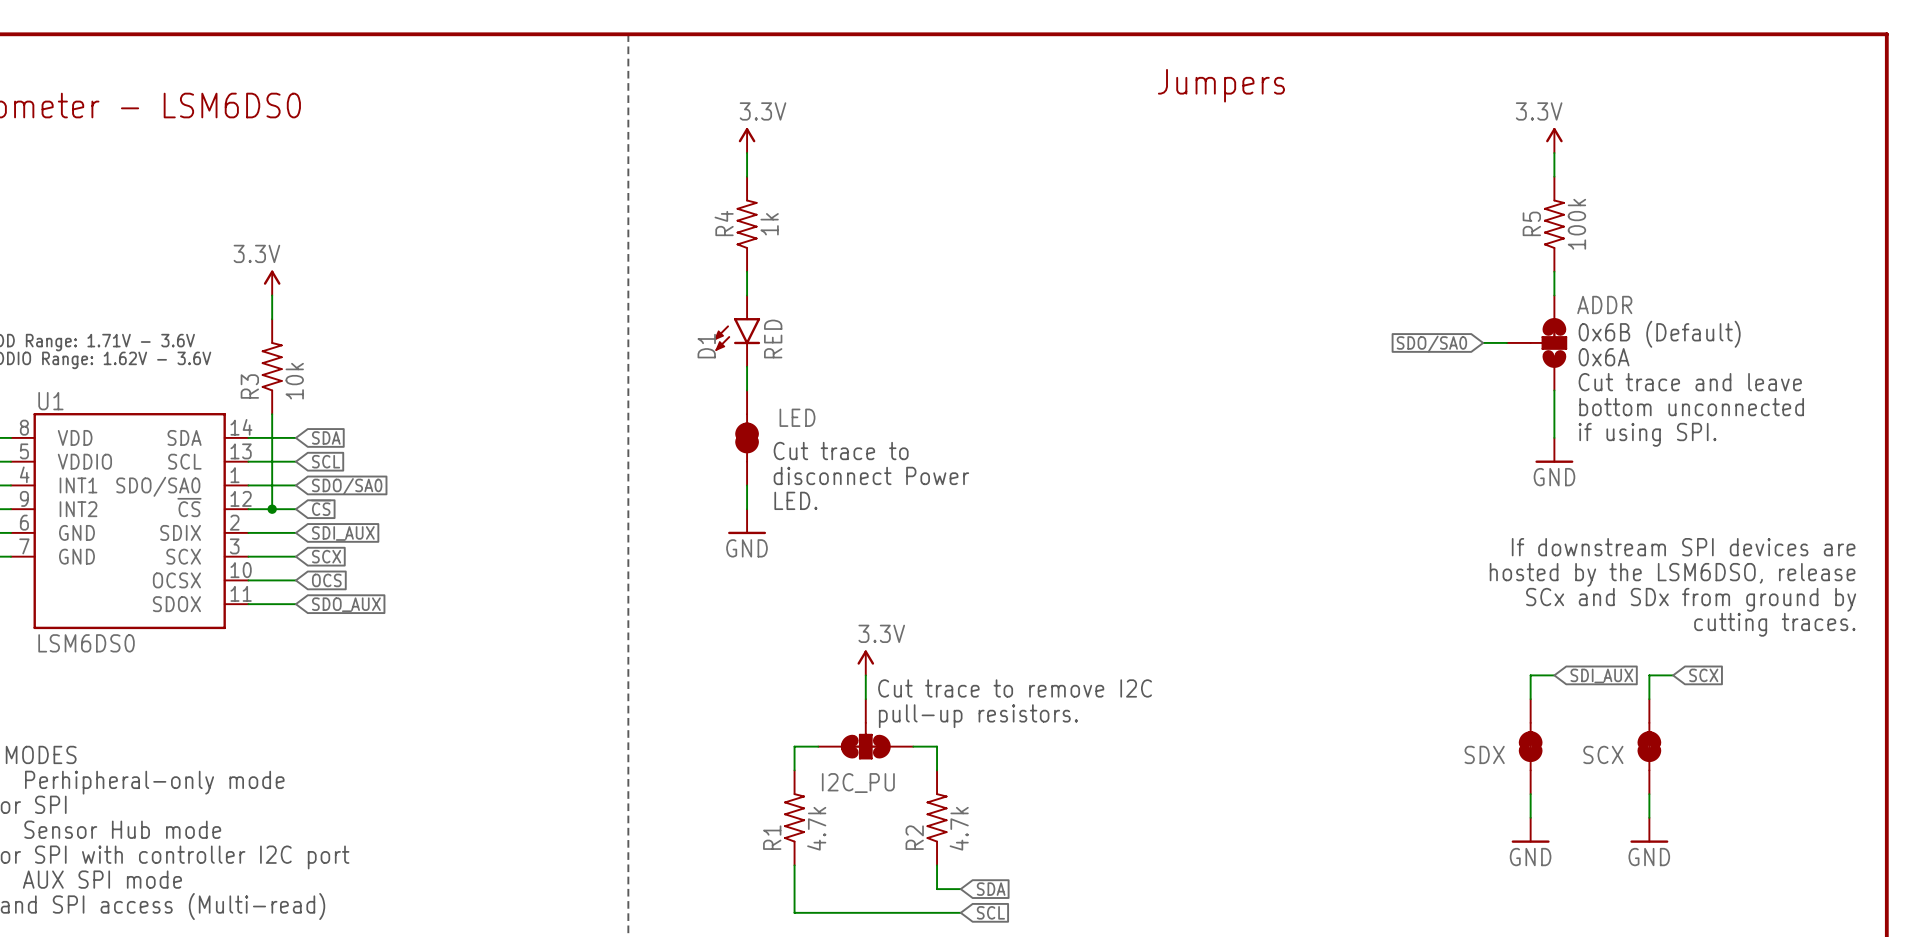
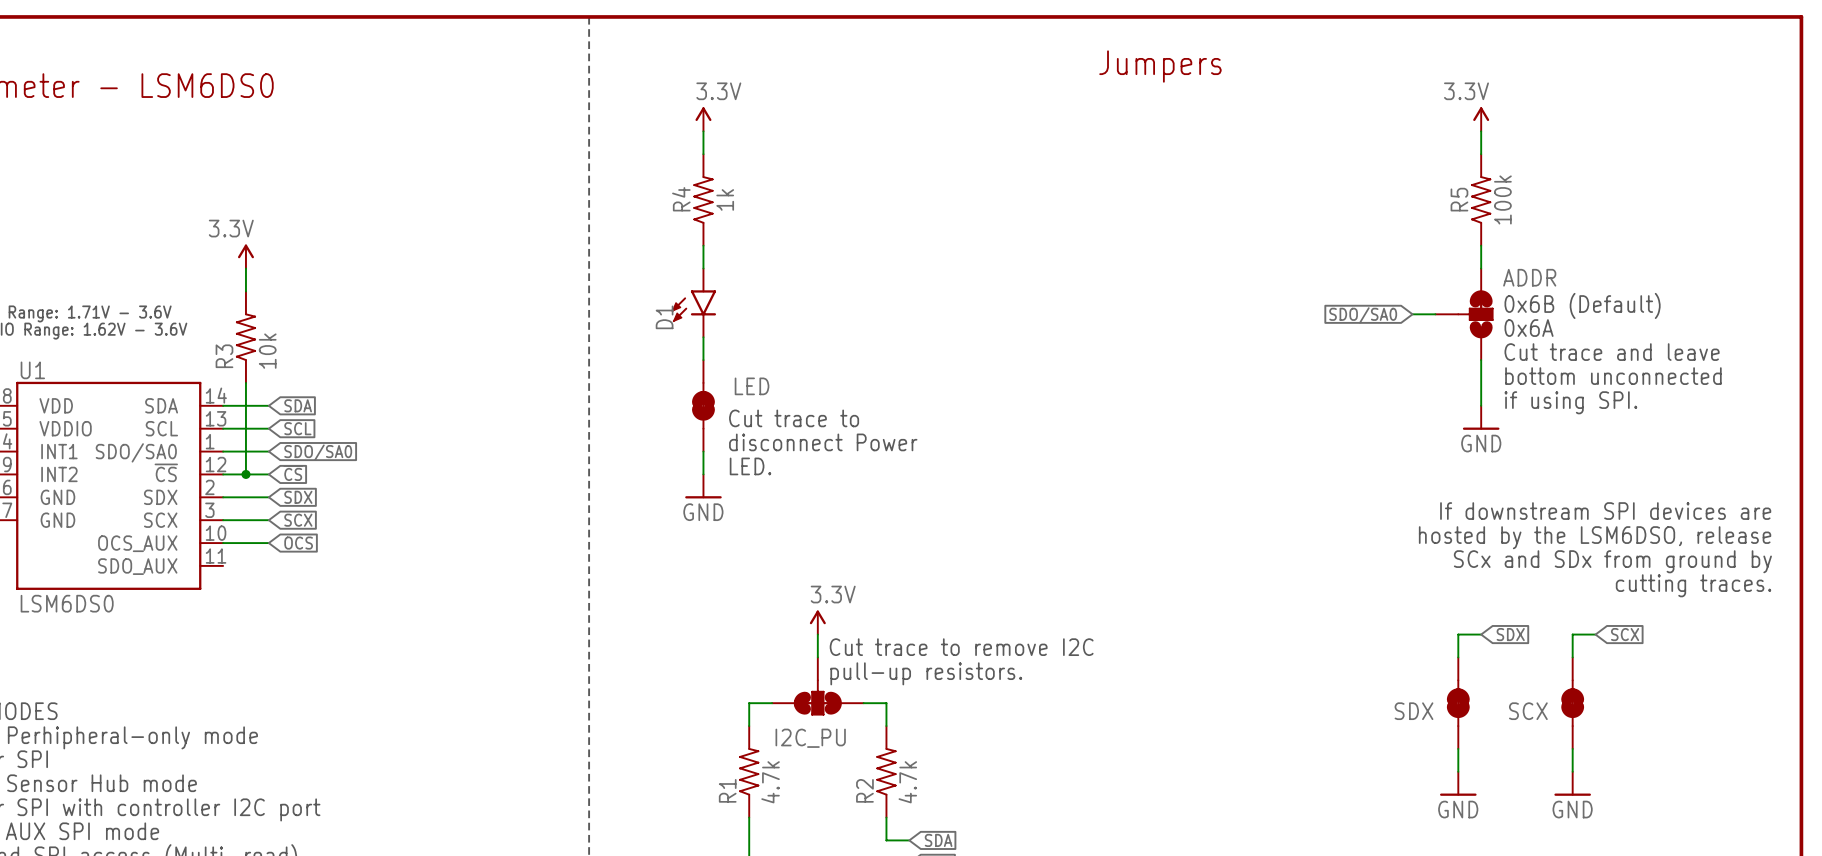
D1 value: RED (773, 339) -> none
U1 pin name: SDIX (180, 532) -> SDX (160, 497)
global label: SDI_AUX (343, 533) -> SDX (298, 497)
U1 pin name: OCSX (176, 580) -> OCS_AUX (137, 543)
U1 pin name: SDOX (176, 604) -> SDO_AUX (137, 566)
wire: (248, 604) (295, 604) -> none
global label: SDO_AUX (346, 604) -> none
global label: SDI_AUX (1601, 675) -> SDX (1510, 634)

